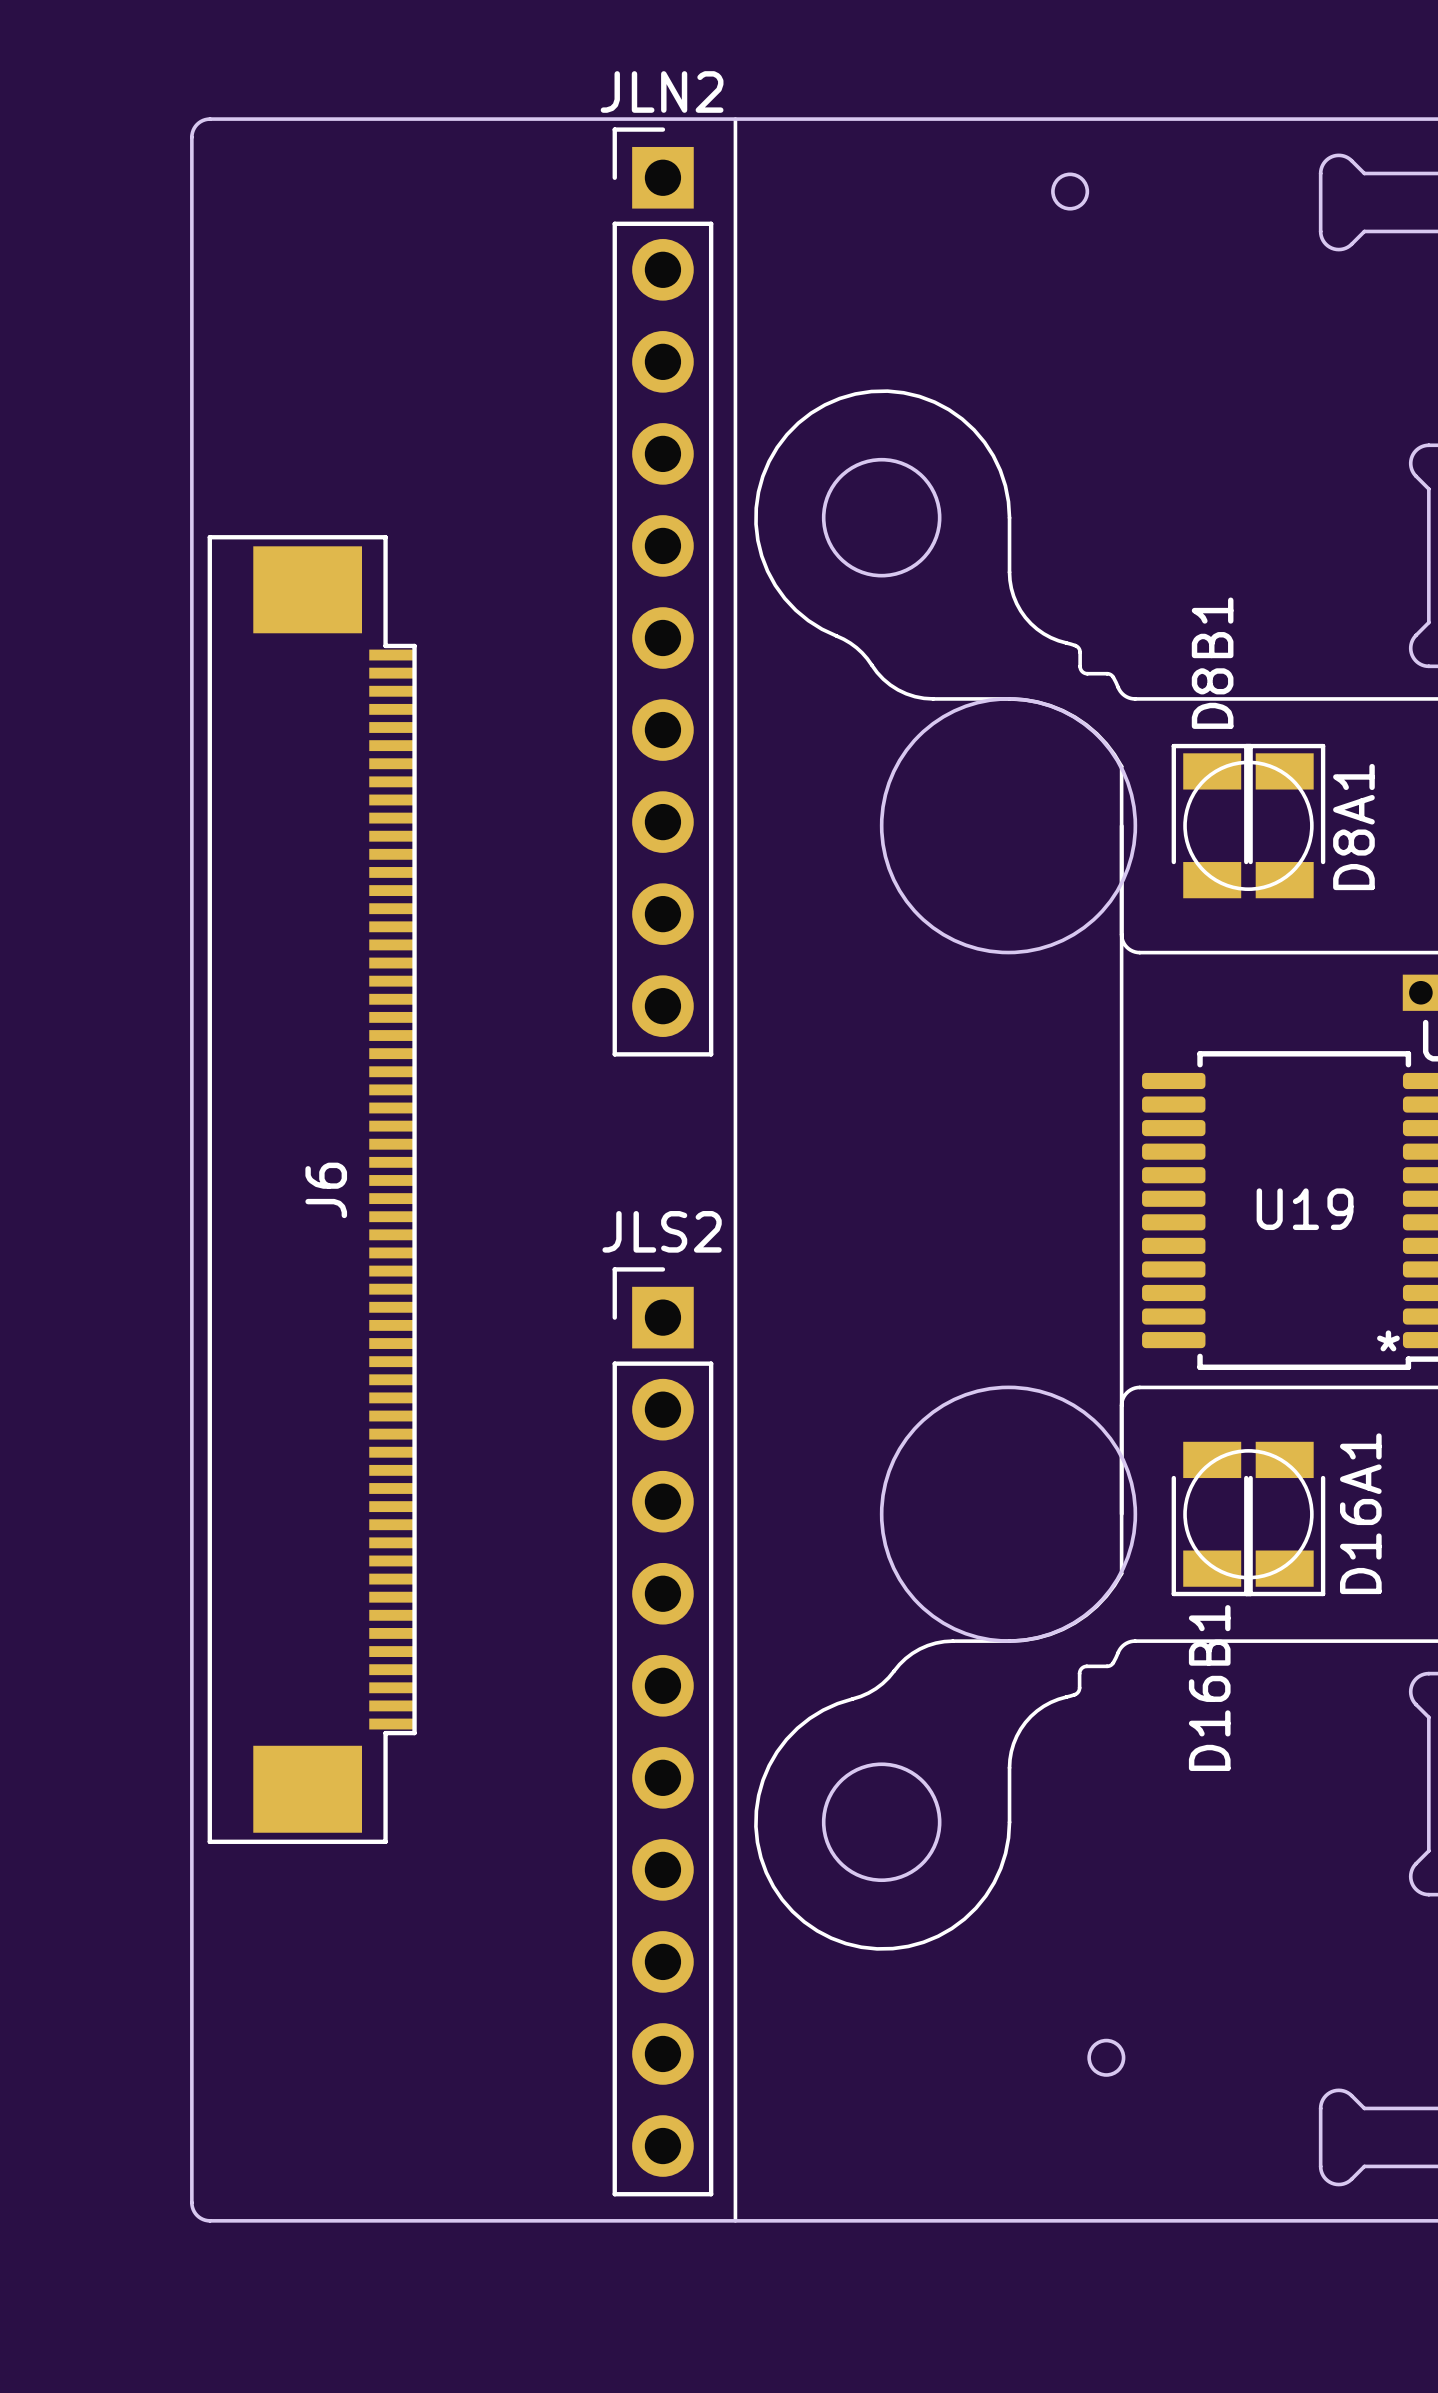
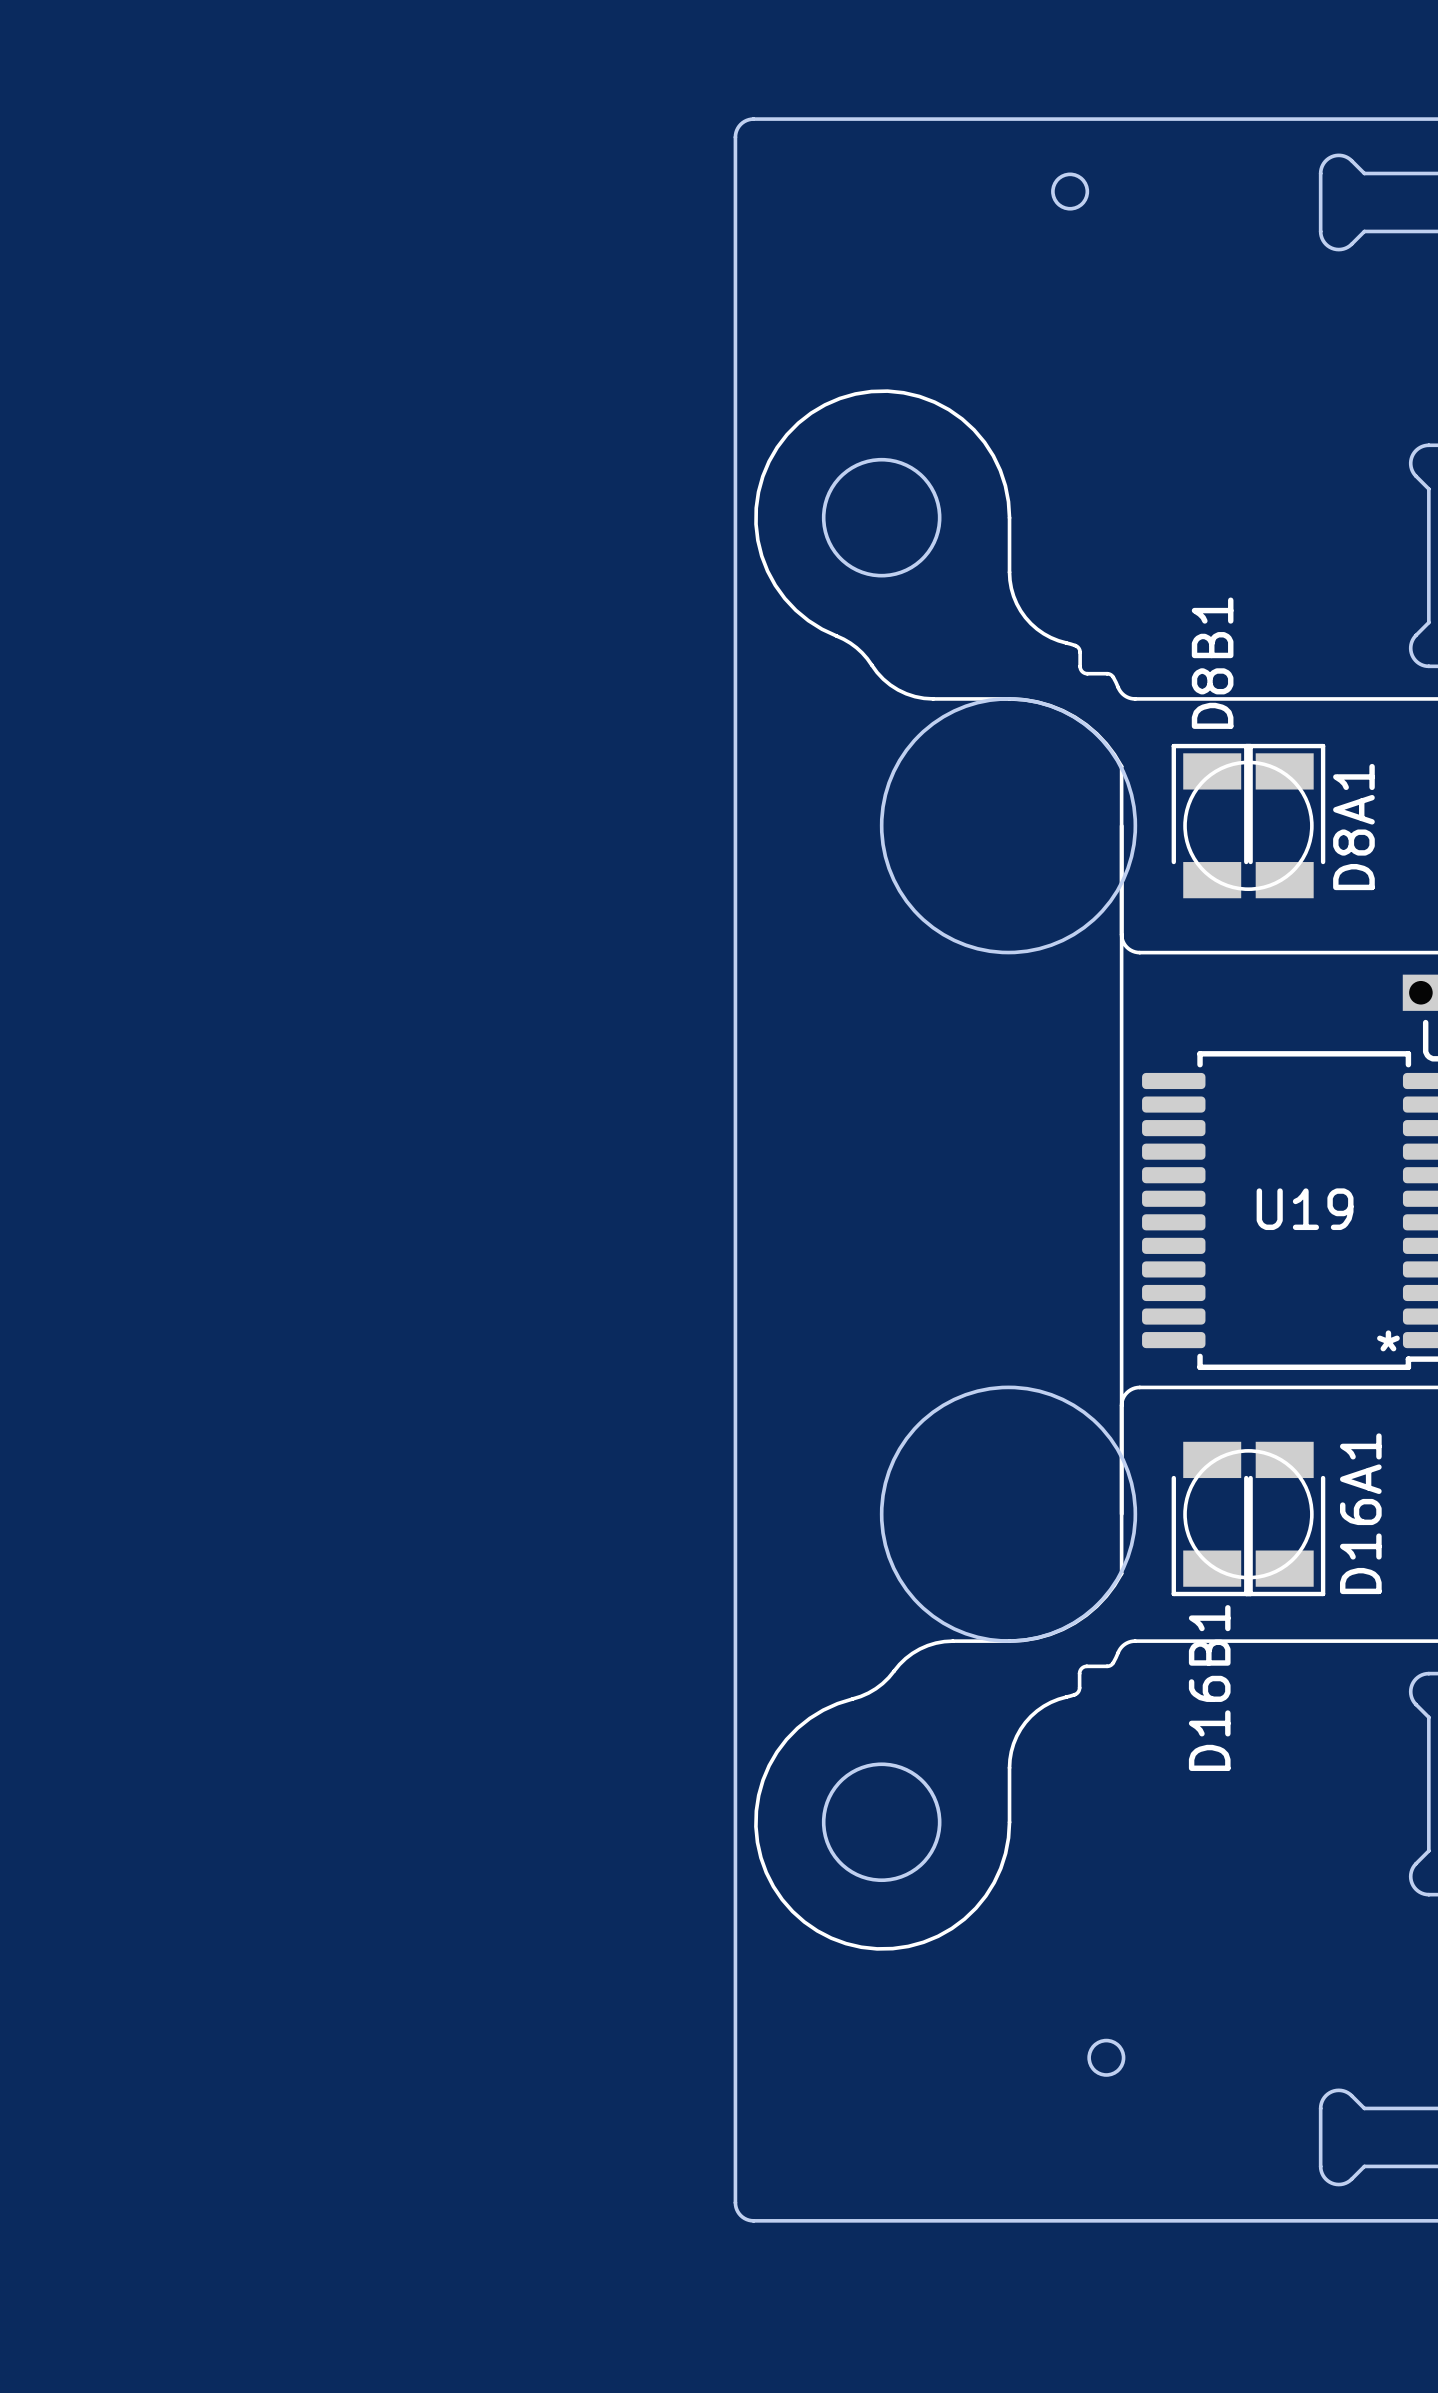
line: (735, 119) (735, 2220) -> none
board edge: (753, 119) (209, 119) (197, 124) (191, 137) (192, 2207) (198, 2217) (209, 2220) (753, 2220) -> (753, 119) (740, 124) (735, 137) (735, 2202) (740, 2215) (753, 2220)
JLN2: (662, 591) -> none
J6: (312, 1189) -> none
JLS2: (662, 1731) -> none

